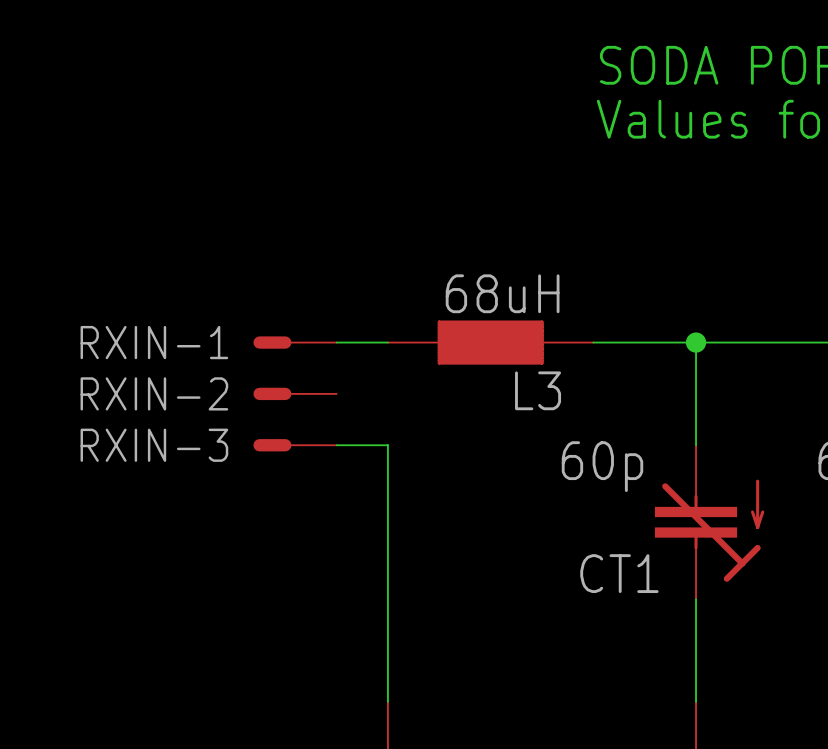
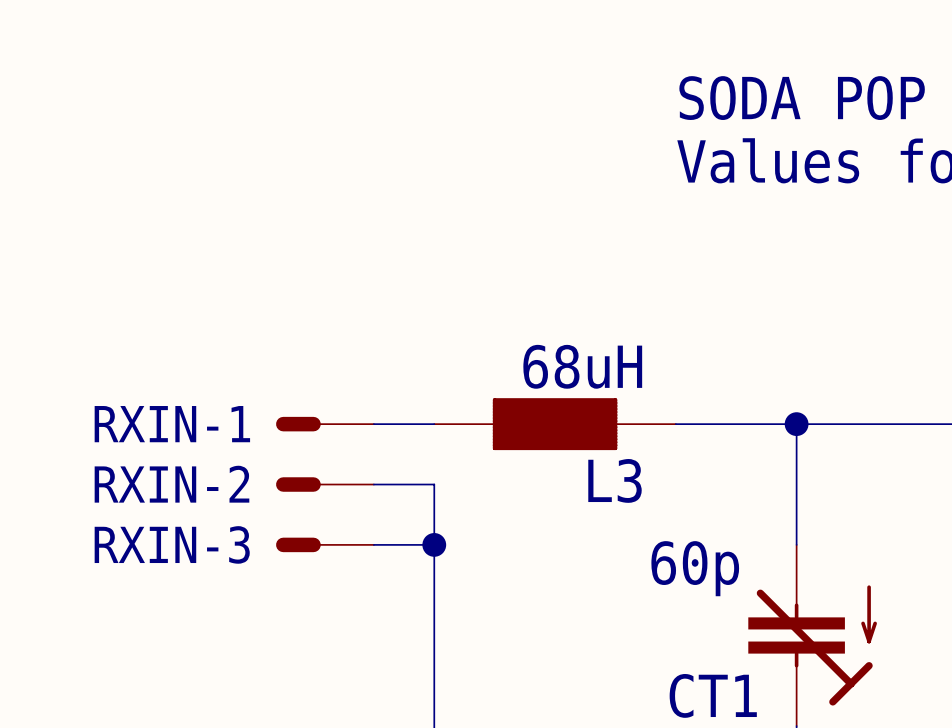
wire: none -> (373, 484) (434, 484) (434, 544)
junction: none -> (434, 544)

